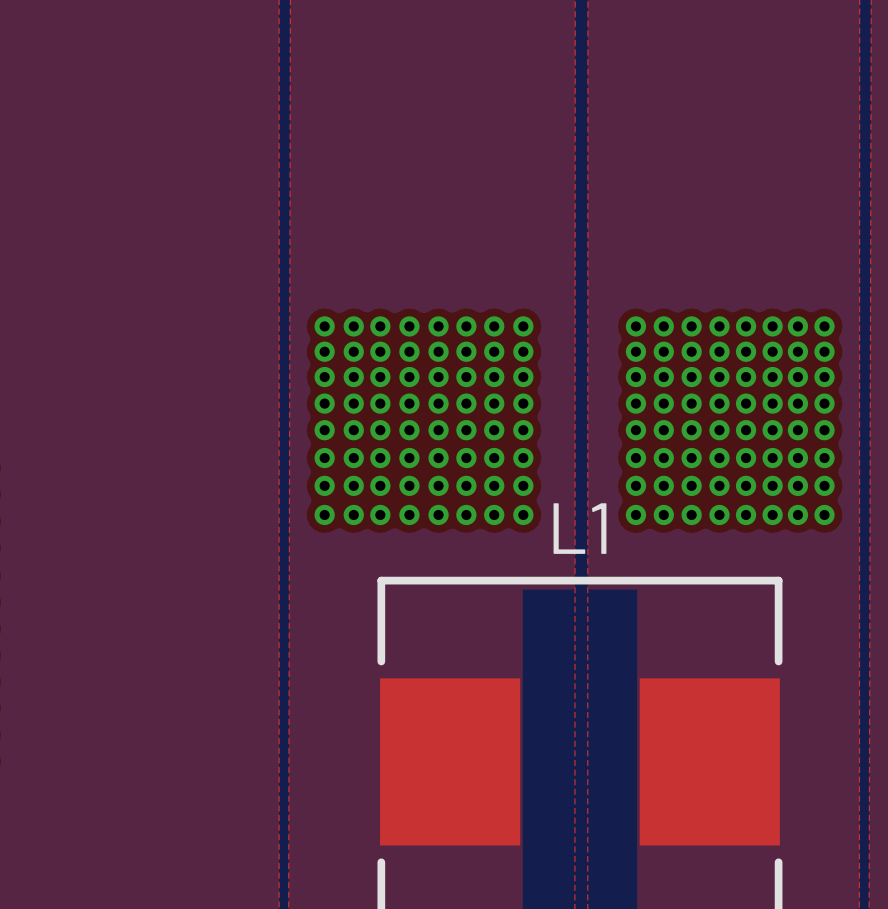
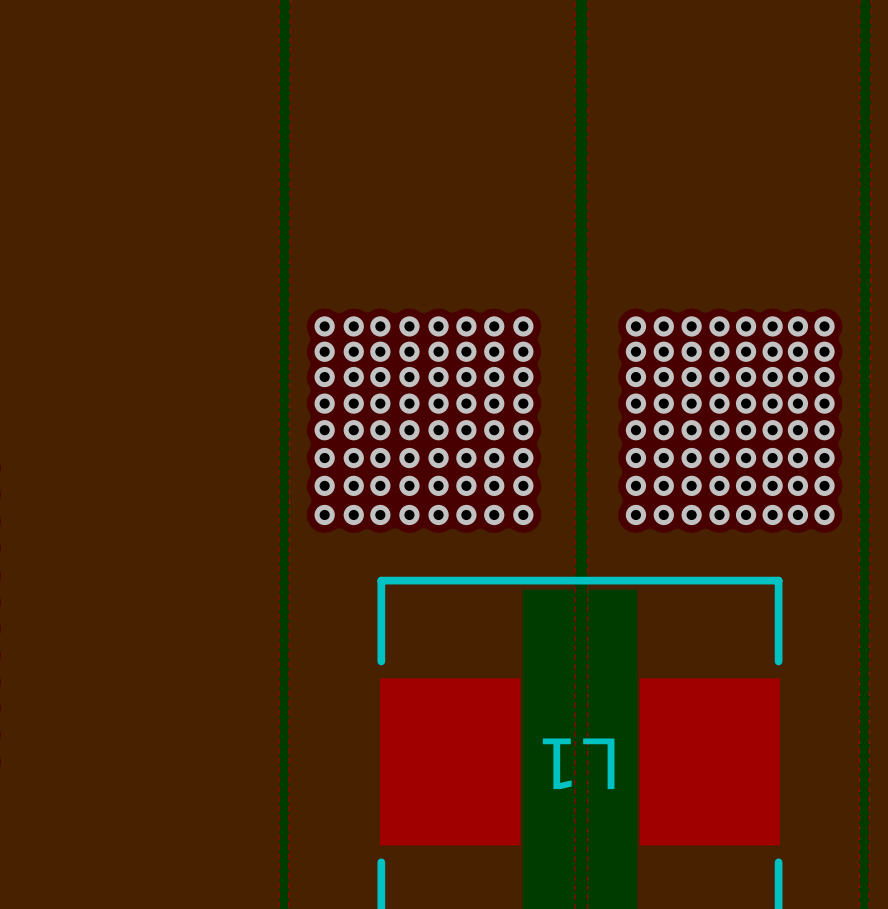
L1 name rotation: 0° (580, 528) -> 180° (578, 763)
L1 name position: L1 (580, 528) -> L1 (578, 763)

